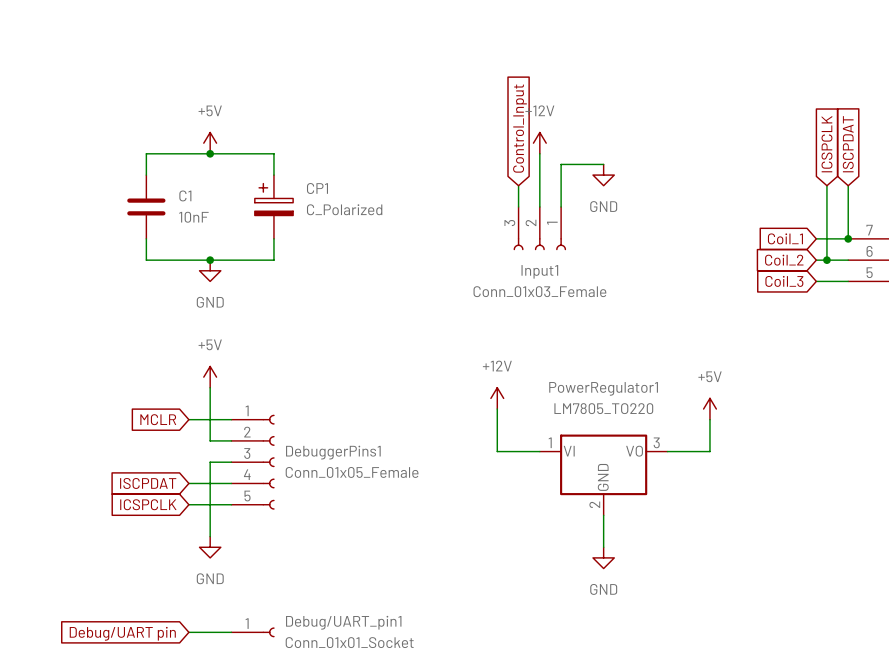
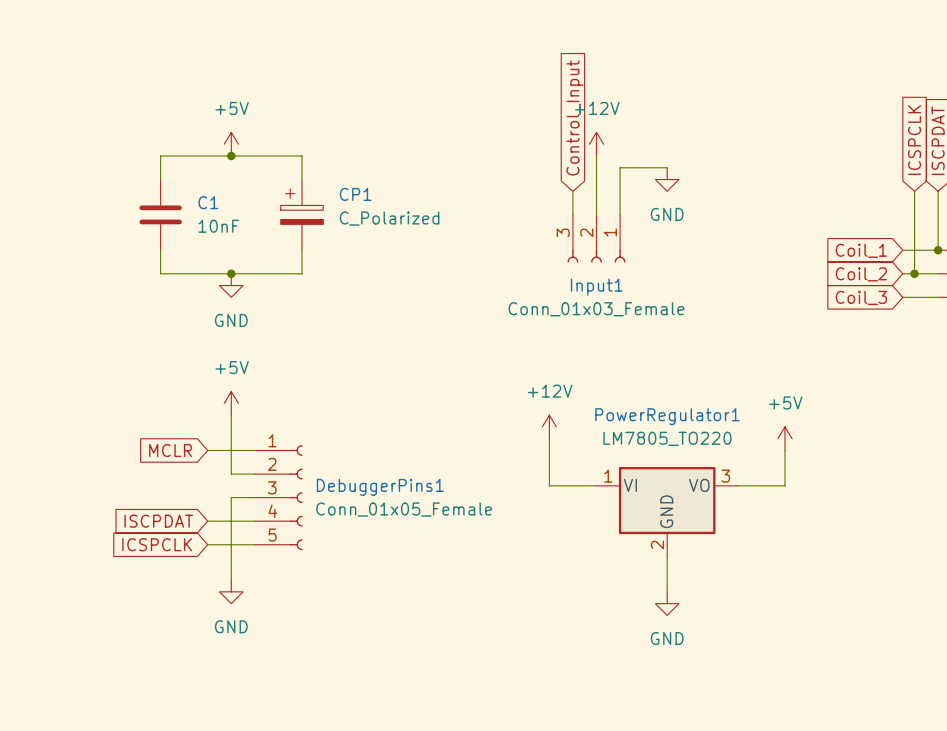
wire: (188, 632) (231, 632) -> none
Debug/UART_pin1: Conn_01x01_Socket (253, 632) -> none
global label: Debug/UART pin (122, 633) -> none

